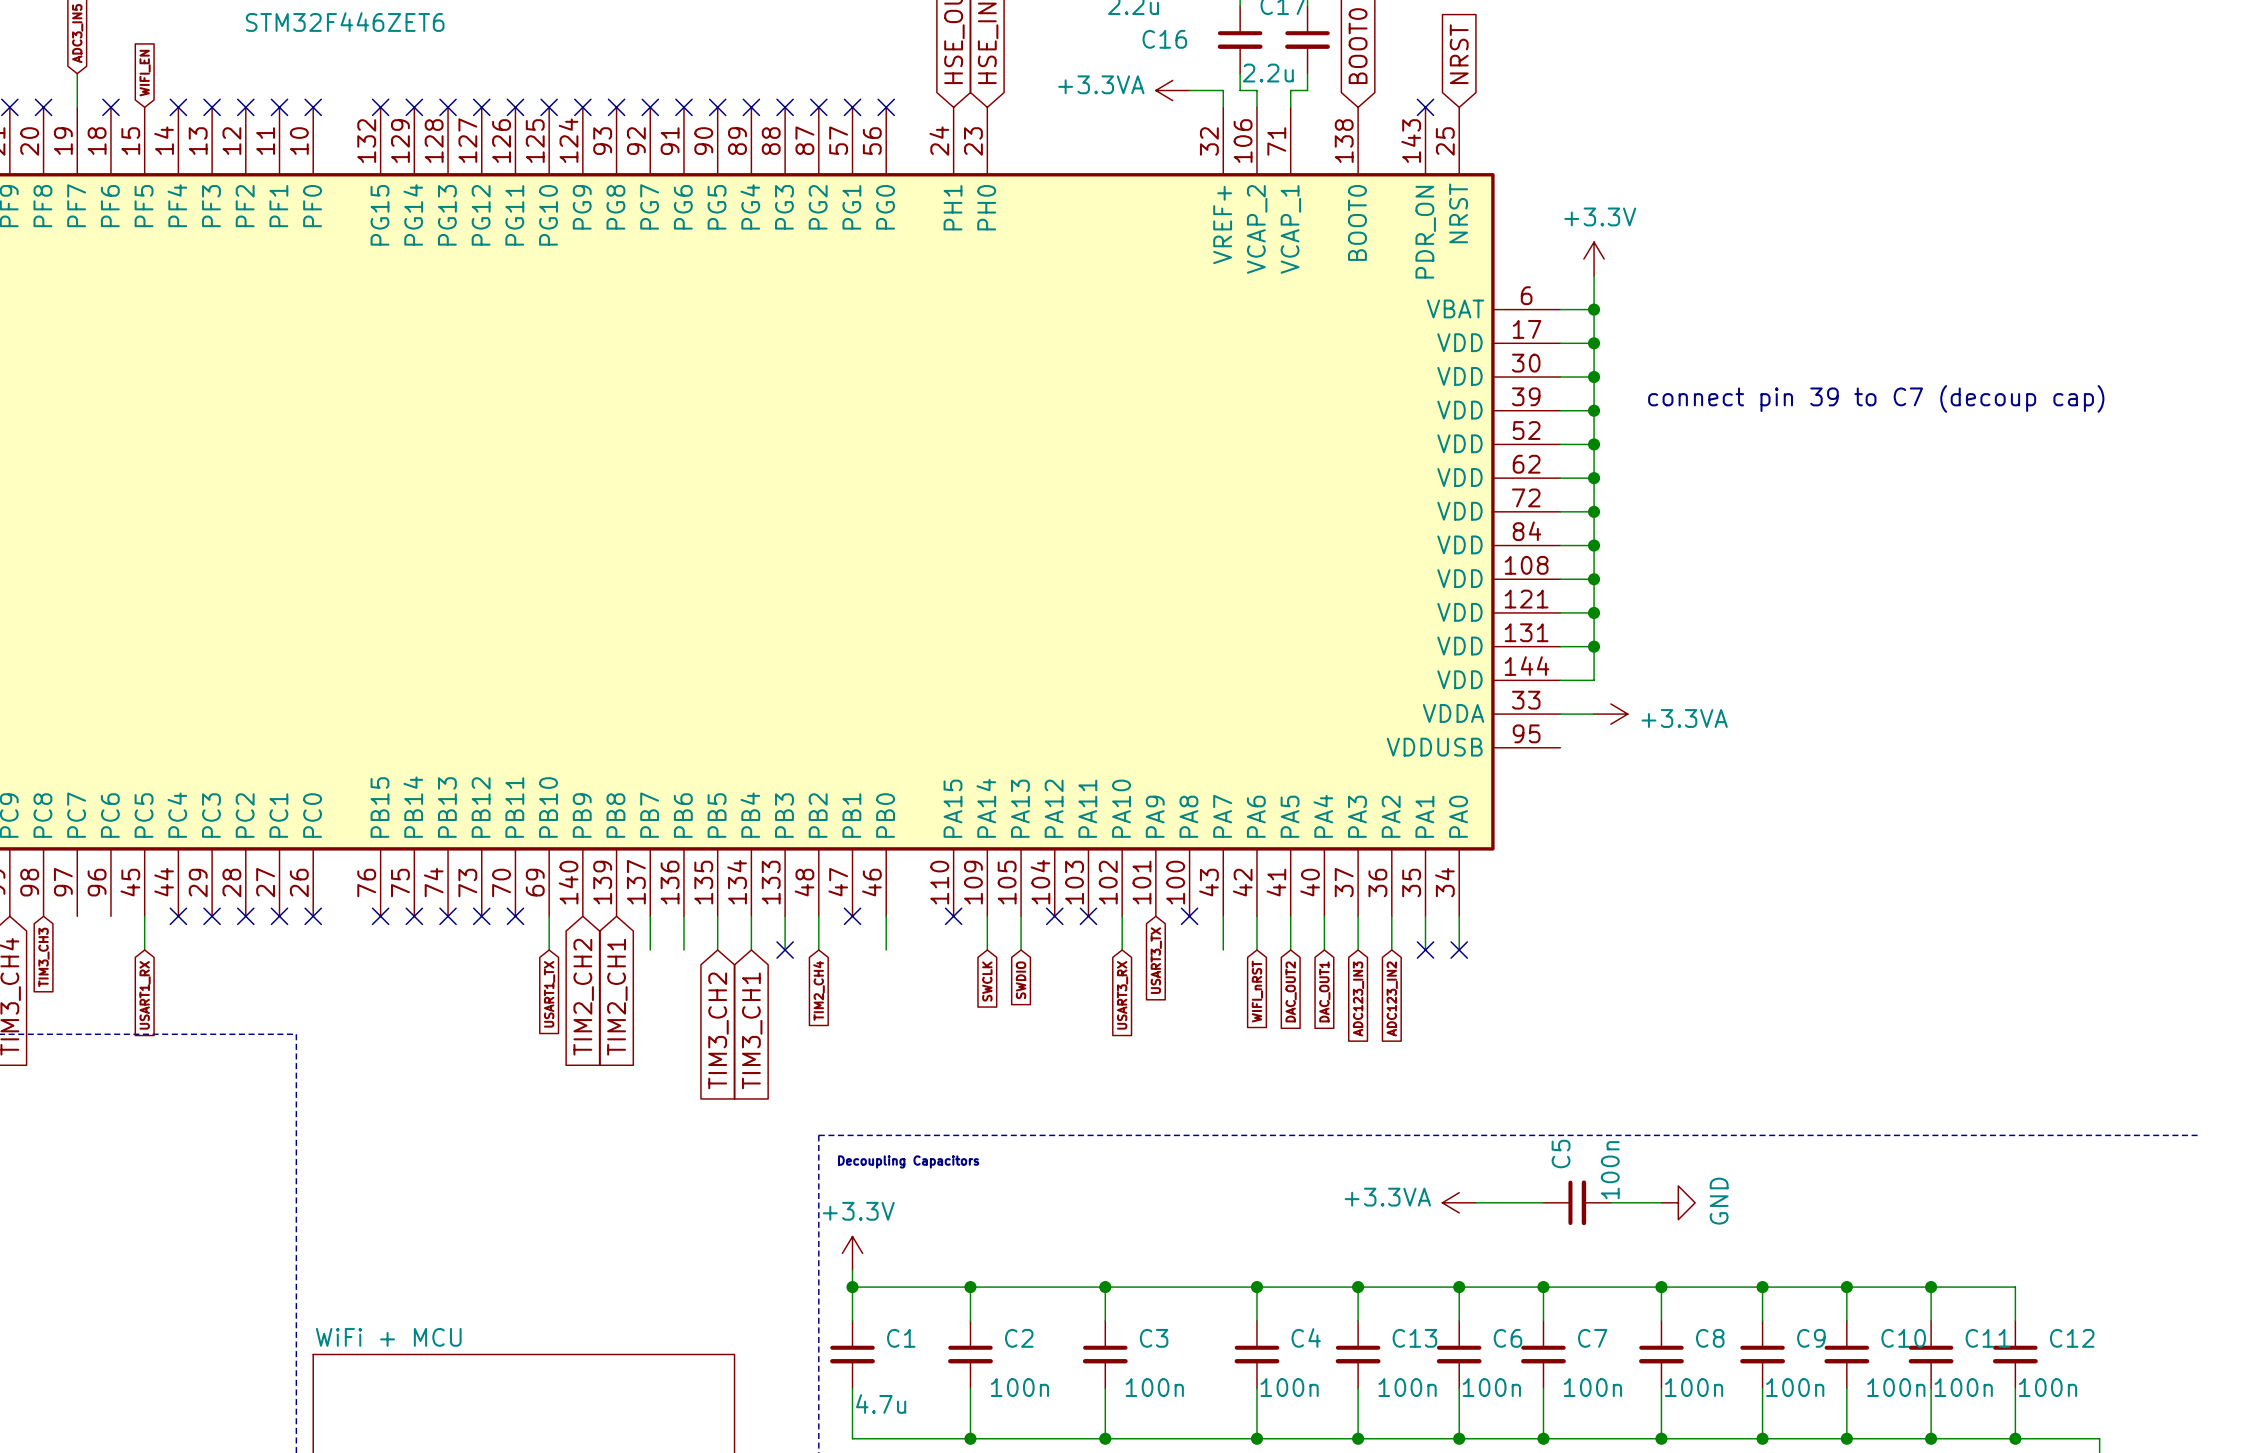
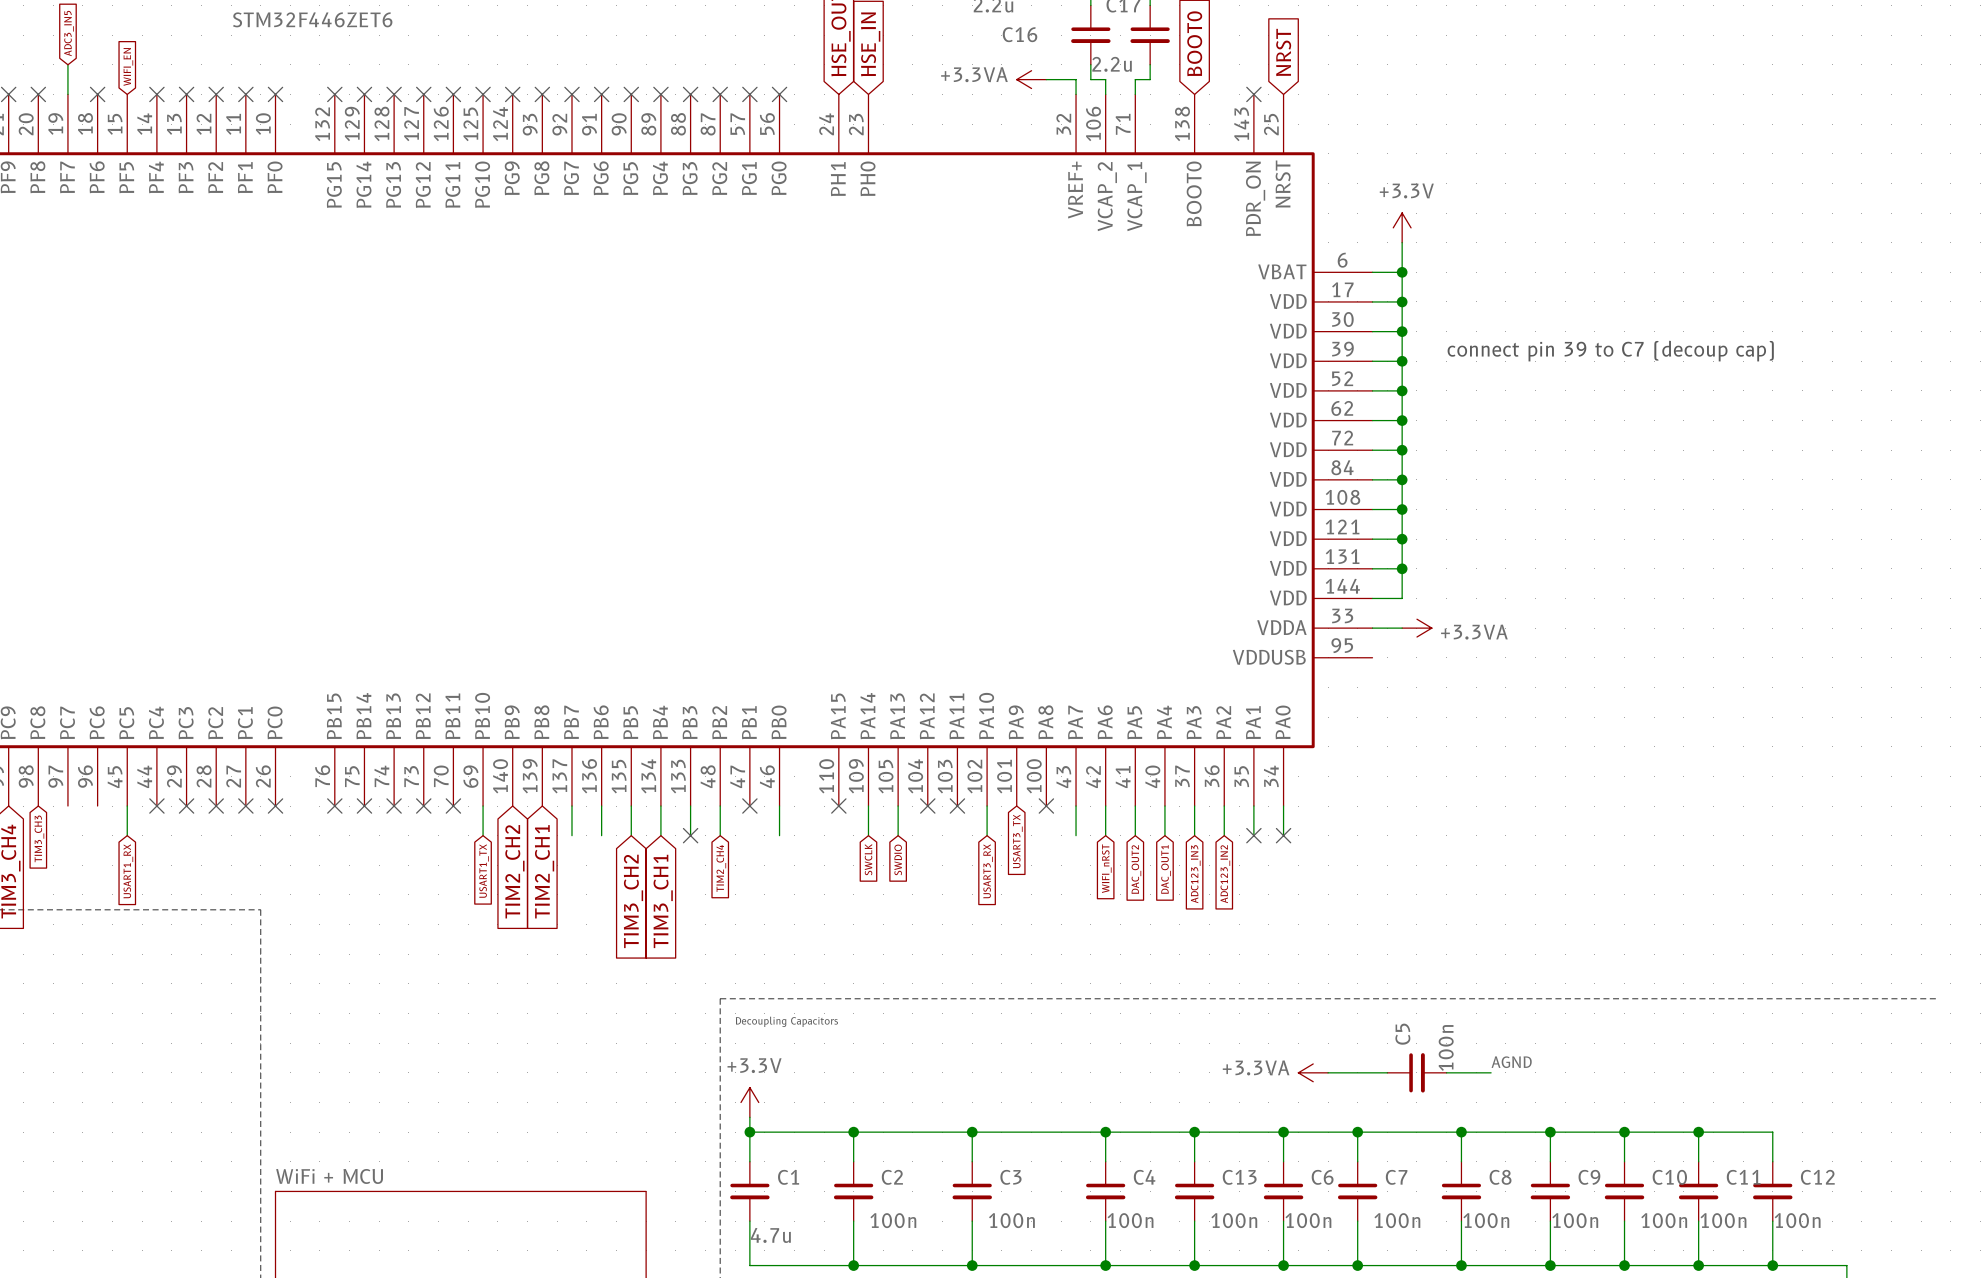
power symbol position: +3.3VA (1459, 1202) -> +3.3VA (1313, 1072)
wire: (1476, 1202) (1543, 1202) -> (1328, 1072) (1387, 1072)
C5 position: (1577, 1202) -> (1416, 1072)
wire: (1610, 1202) (1661, 1202) -> (1446, 1072) (1491, 1072)
power symbol: GND (1678, 1202) -> none
label: none -> AGND (1511, 1062)

